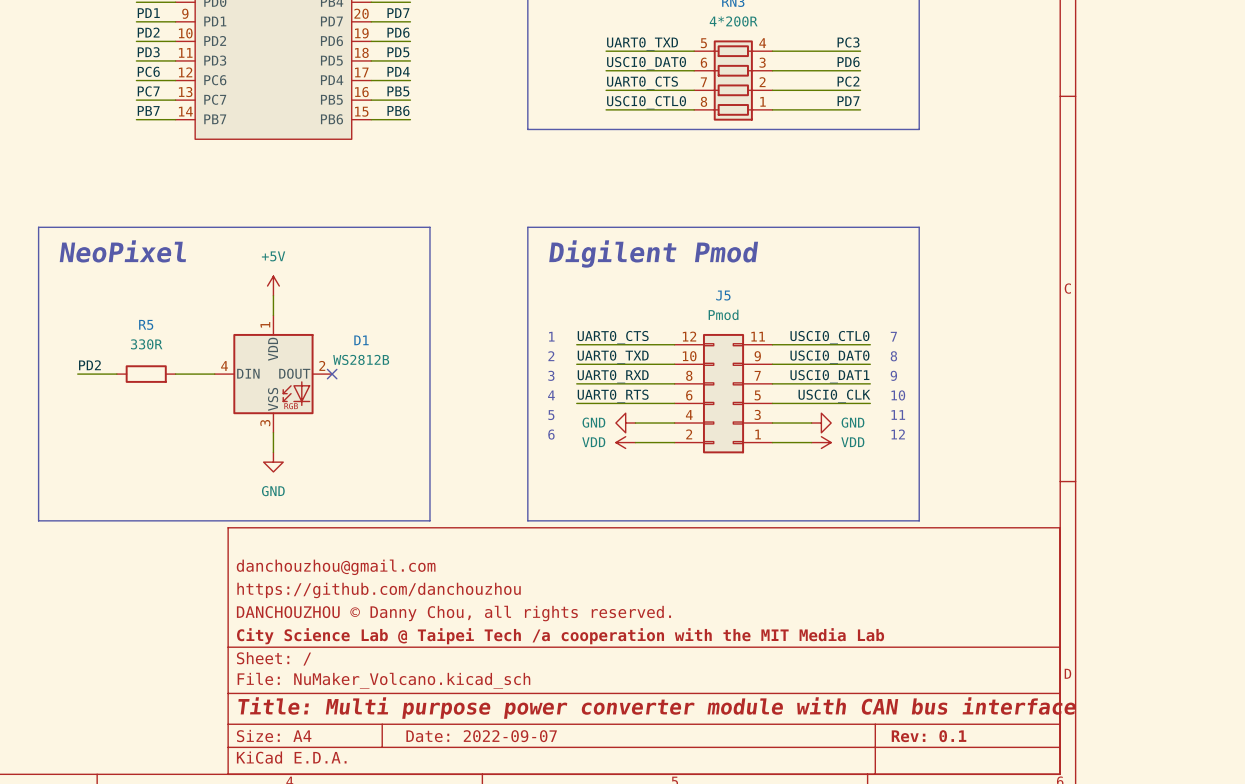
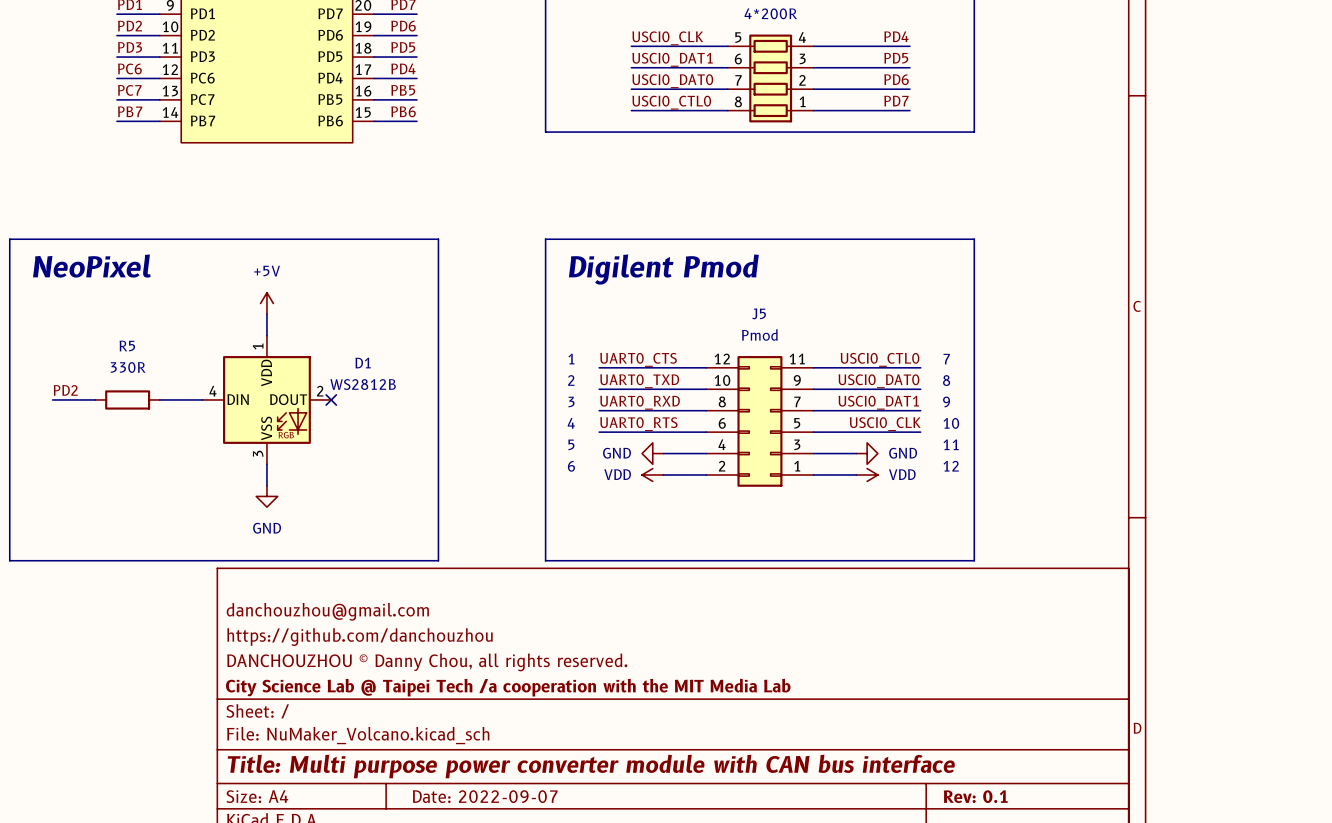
label: PC3 (848, 42) -> PD4 (896, 36)
label: UART0_TXD (642, 43) -> USCI0_CLK (667, 38)
label: PD6 (848, 62) -> PD5 (896, 58)
label: USCI0_DAT0 (646, 63) -> USCI0_DAT1 (672, 59)
label: PC2 (848, 81) -> PD6 (896, 79)
label: UART0_CTS (642, 83) -> USCI0_DAT0 (672, 81)

